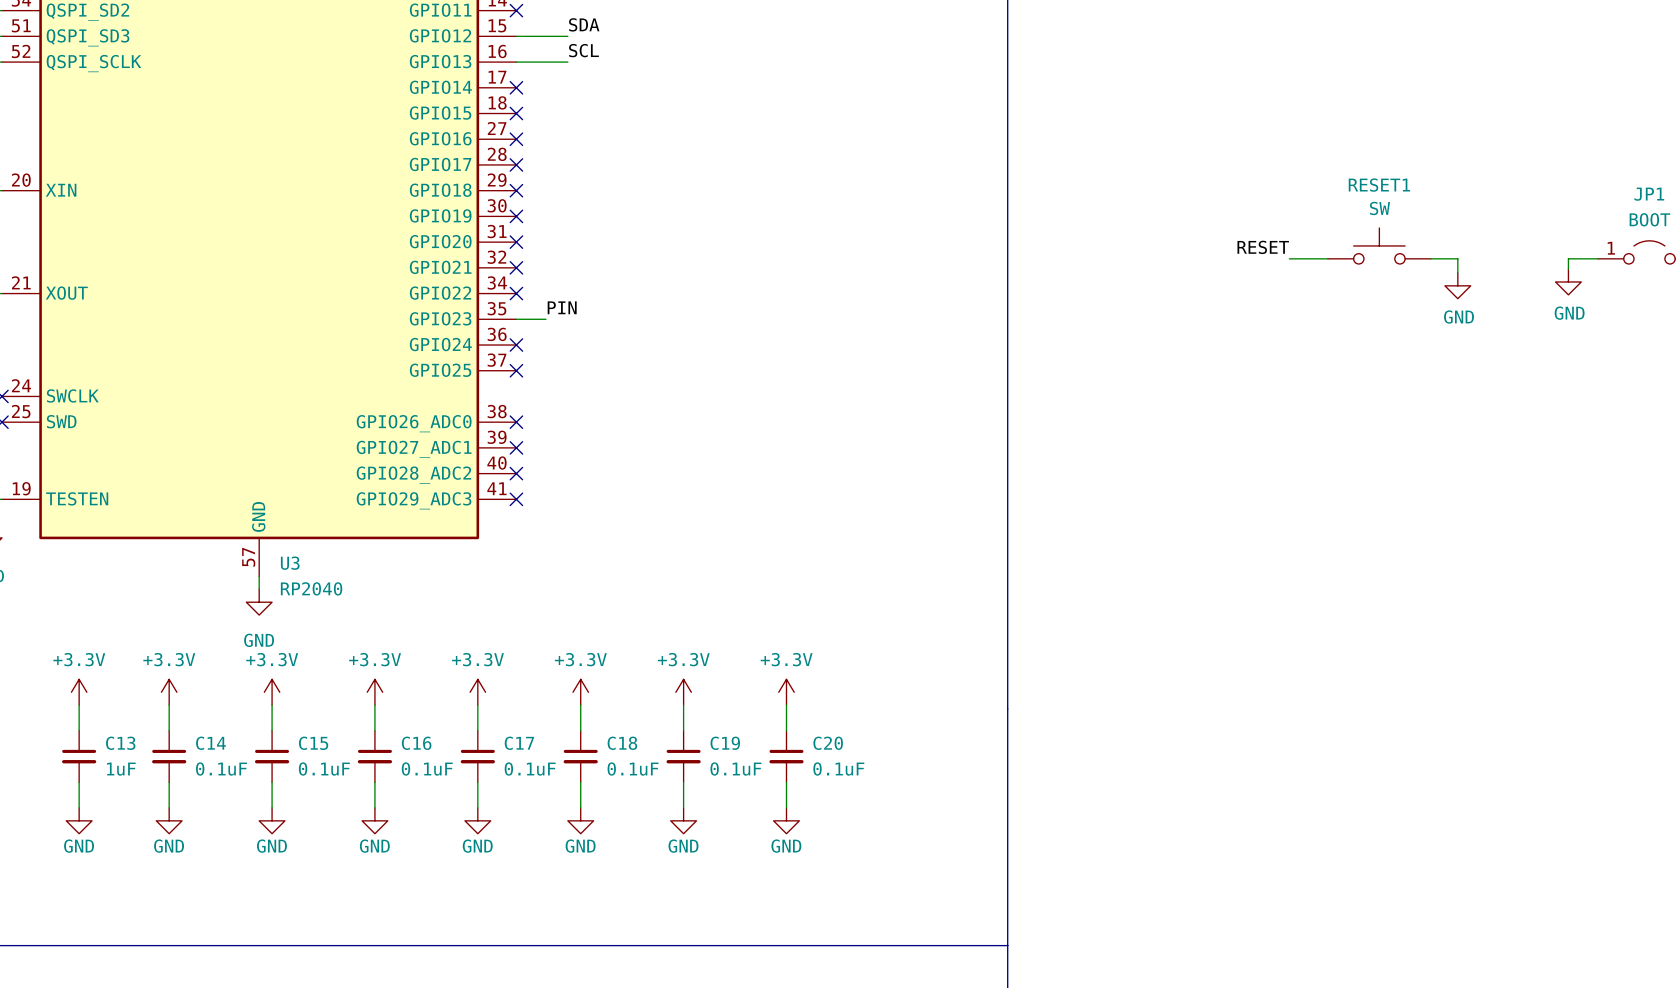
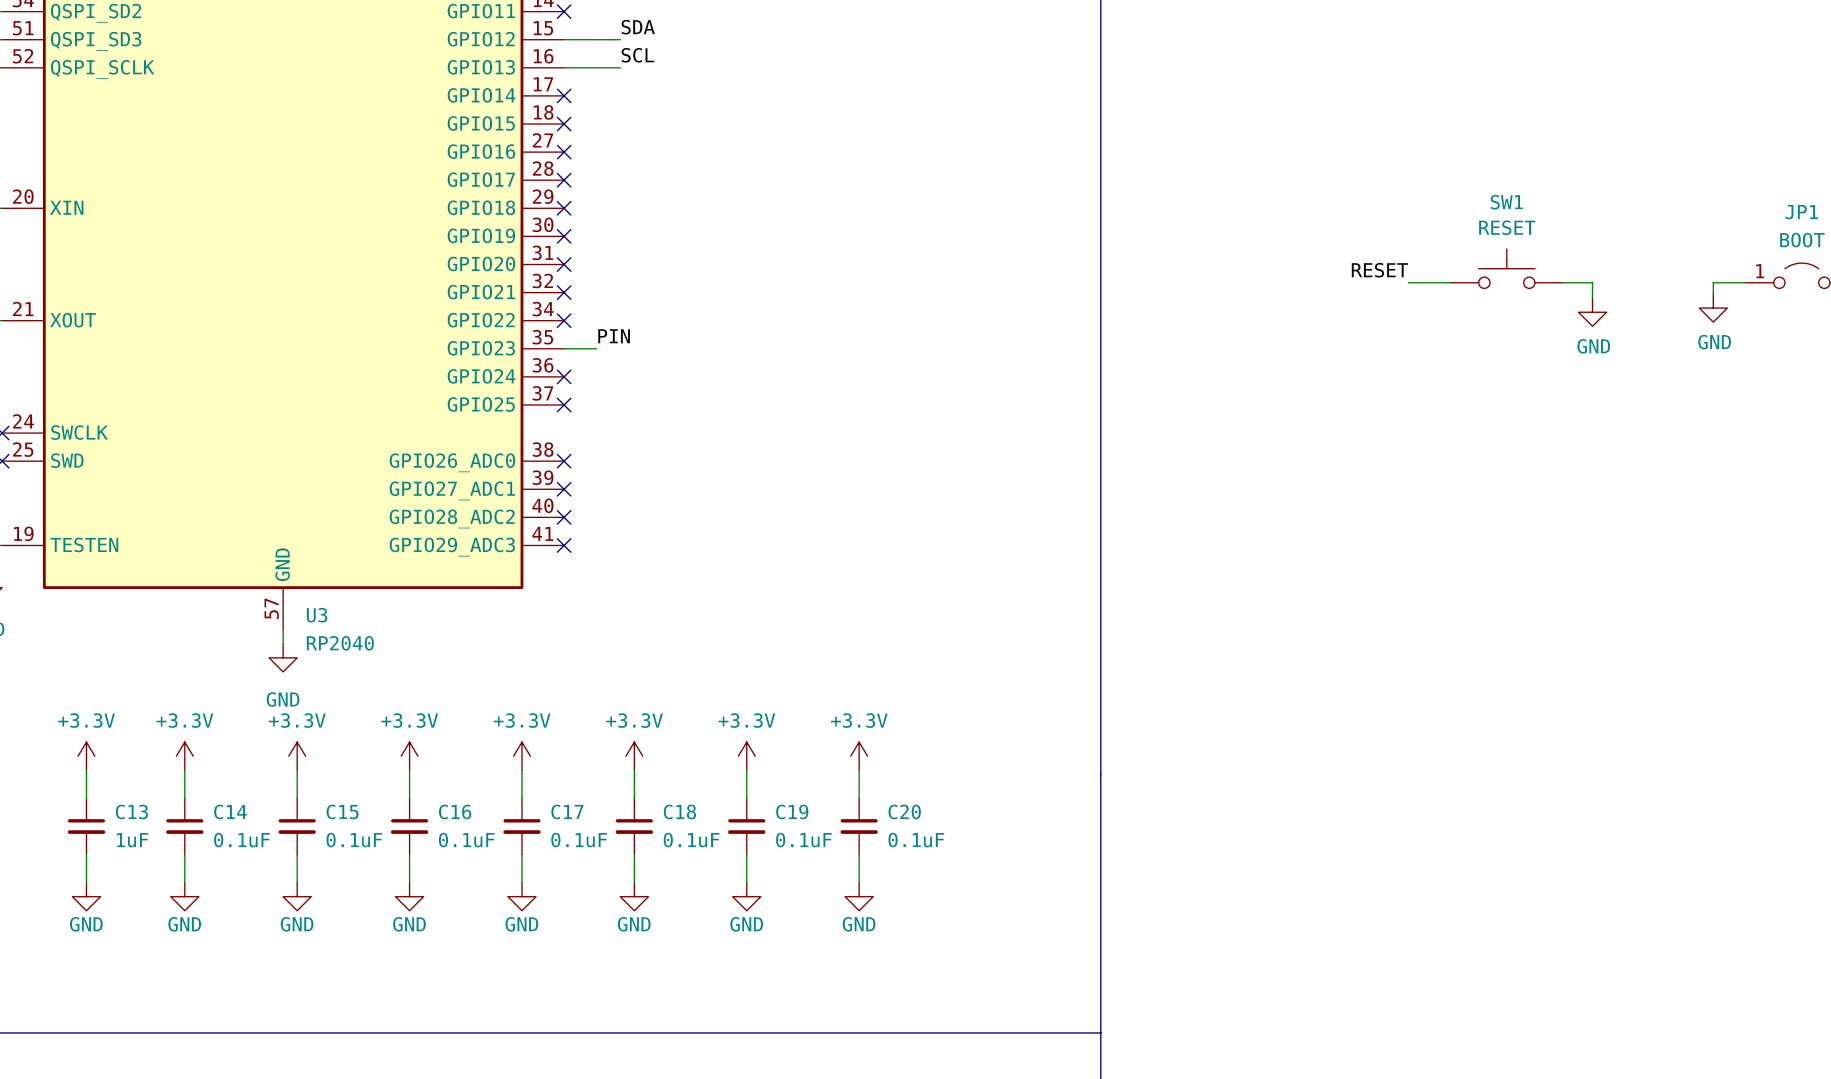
RESET1 name: RESET1 (1379, 185) -> SW1 (1506, 202)
RESET1 value: SW (1379, 208) -> RESET (1507, 227)

